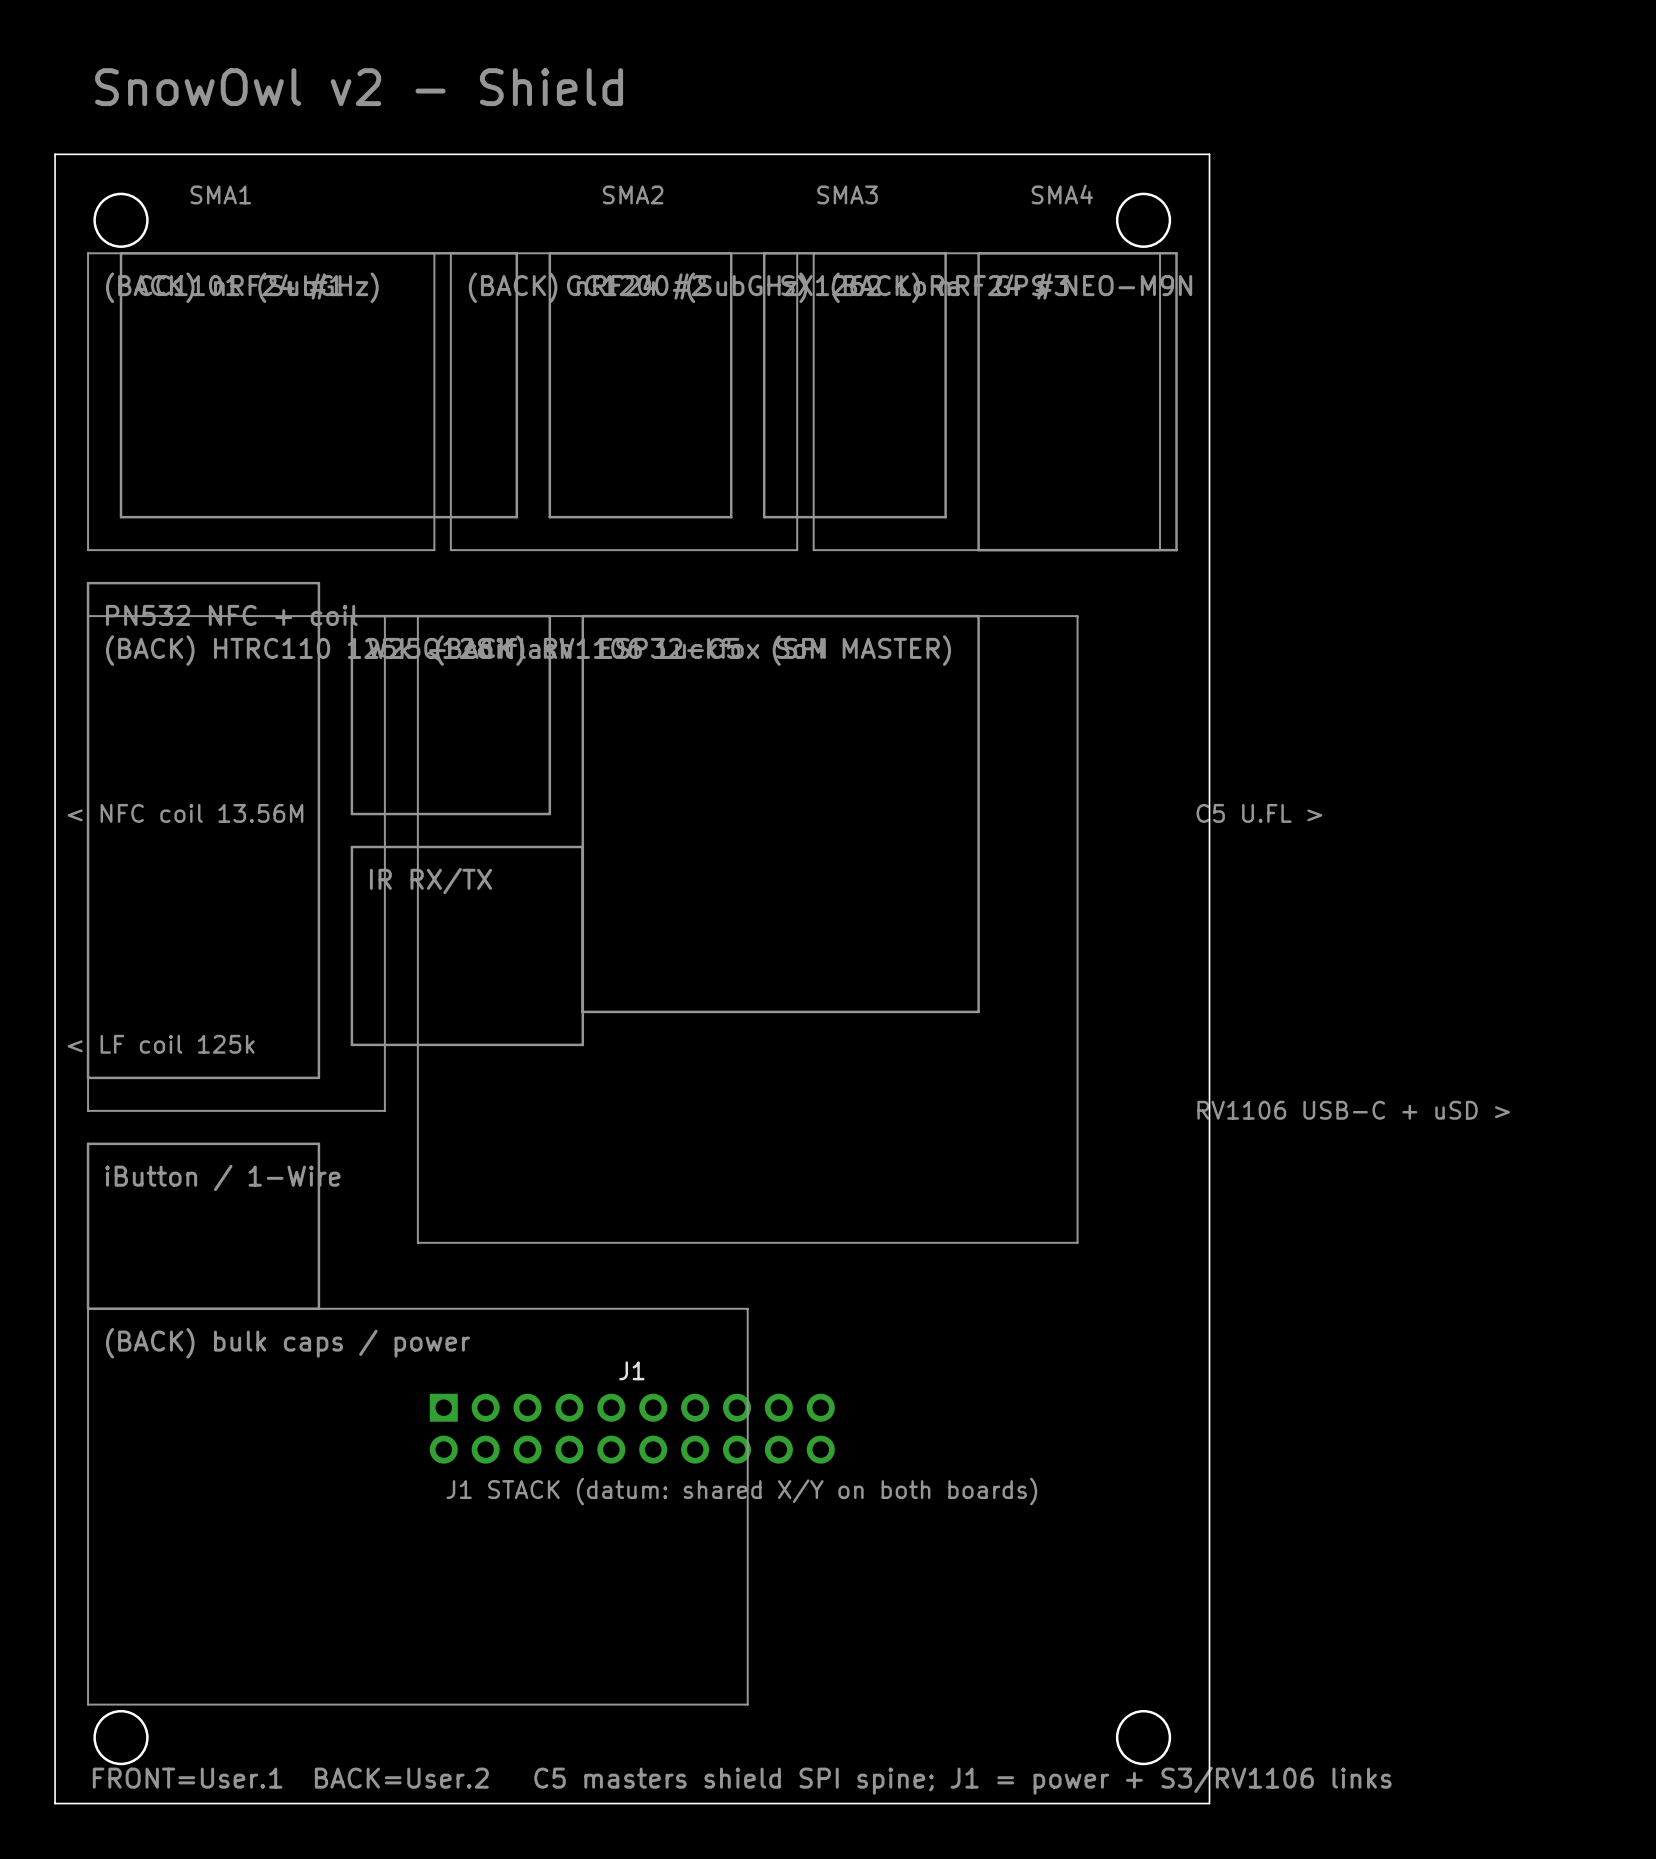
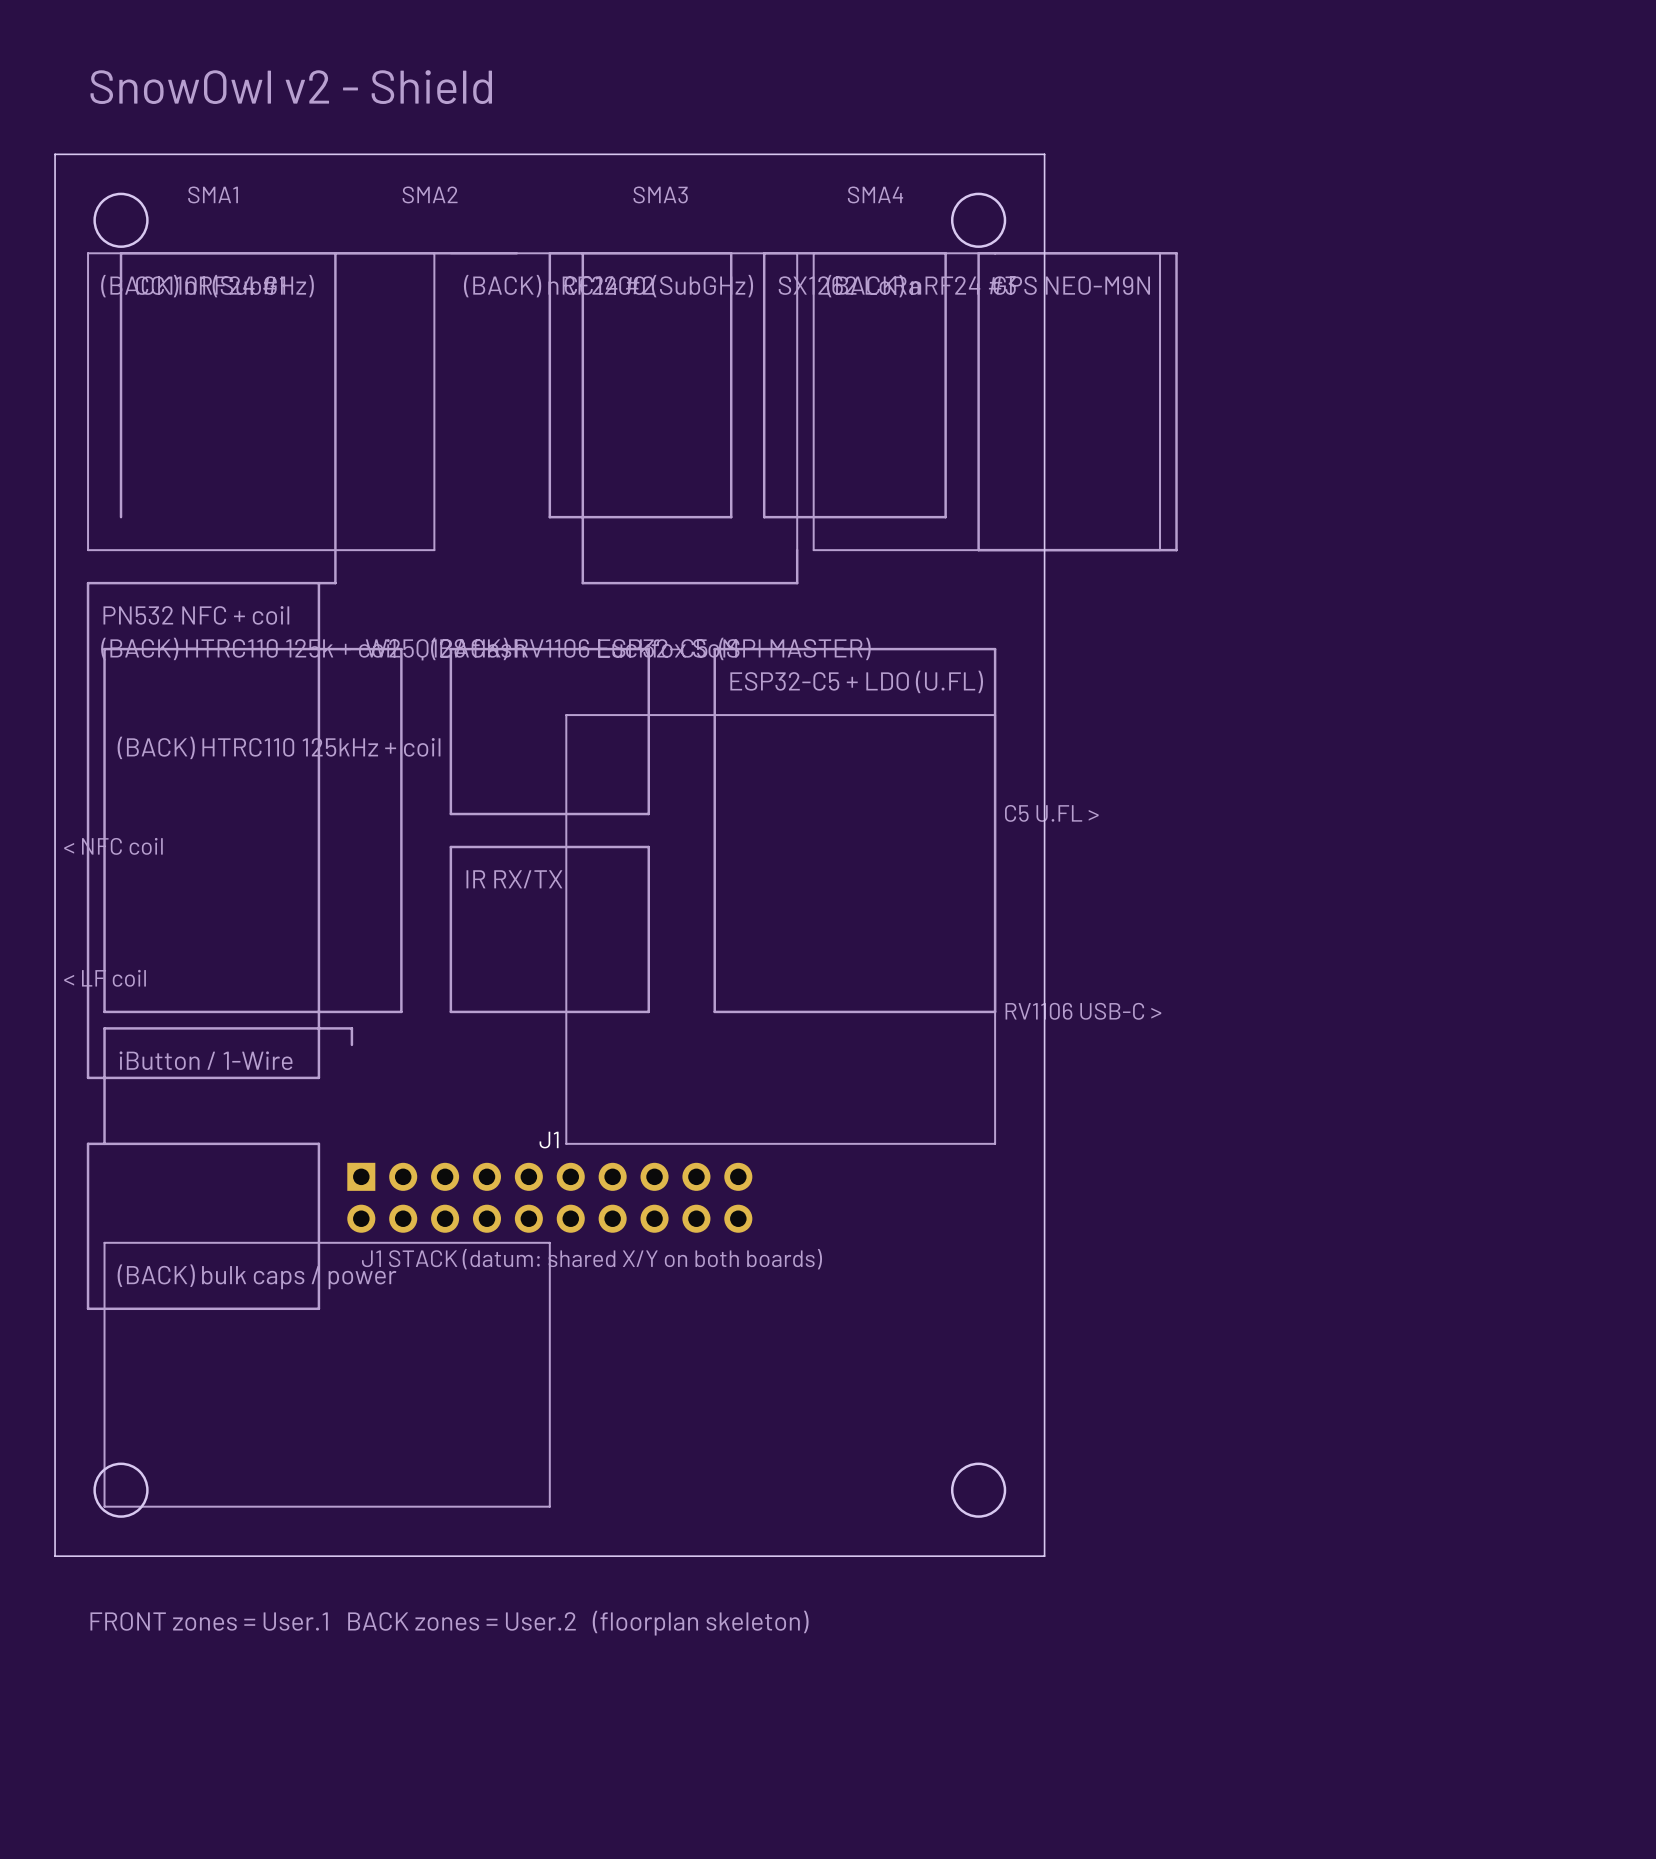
board edge: (1044, 154) (1209, 154) (1209, 1803) (55, 1803) (55, 1556) -> (1044, 154) (1044, 1556) (55, 1556)
text position: SMA2 (633, 194) -> SMA2 (430, 194)
text position: SMA3 (847, 194) -> SMA3 (660, 194)
text position: SMA4 (1062, 194) -> SMA4 (875, 194)
round board edge position: (1143, 220) -> (978, 220)
line: none -> (335, 253) (335, 583) (318, 583)
line: (450, 253) (450, 550) (797, 550) -> (582, 253) (582, 583) (797, 583) (797, 550)
line: (516, 253) (516, 517) (121, 517) -> none
line: (88, 616) (88, 1110) (384, 1110) (384, 616) (88, 616) -> (104, 649) (104, 1011) (401, 1011) (401, 649) (104, 649)
text: none -> ESP32-C5 + LDO (U.FL) (856, 681)
line: none -> (566, 715) (995, 715) (995, 1143) (566, 1143) (566, 715)
text: none -> (BACK) HTRC110 125kHz + coil (279, 747)
text: < NFC coil 13.56M (185, 813) -> < NFC coil (113, 846)
text position: C5 U.FL > (1259, 813) -> C5 U.FL > (1051, 813)
line: (450, 814) (351, 814) (351, 616) (549, 616) (549, 814) -> (450, 814) (450, 649) (648, 649) (648, 814) (549, 814)
line: (450, 847) (351, 847) (351, 1028) -> (450, 847) (450, 1011) (582, 1011)
text position: IR RX/TX (430, 881) -> IR RX/TX (514, 879)
text: none -> < LF coil (105, 978)
line: (648, 1011) (714, 1011) -> (648, 1011) (648, 847) (582, 847)
line: (978, 1011) (978, 616) (582, 616) (582, 1044) (351, 1044) -> (978, 1011) (995, 1011) (995, 649) (714, 649) (714, 1011)
text: none -> RV1106 USB-C > (1083, 1011)
line: none -> (351, 1028) (104, 1028) (104, 1143)
text: < LF coil 125k (161, 1044) -> none
text: RV1106 USB-C + uSD > (1353, 1110) -> none
text position: iButton / 1-Wire (222, 1177) -> iButton / 1-Wire (206, 1060)
line: (417, 1242) (417, 616) (1077, 616) (1077, 1242) (549, 1242) -> (417, 1242) (104, 1242) (104, 1506) (549, 1506) (549, 1242)
line: (88, 1308) (88, 1704) (747, 1704) (747, 1308) (88, 1308) -> none
text position: (BACK) bulk caps / power (288, 1343) -> (BACK) bulk caps / power (256, 1276)
J1 position: (632, 1428) -> (549, 1197)
text position: J1 STACK (datum: shared X/Y on both boards) (741, 1491) -> J1 STACK (datum: shared X/Y on both boards) (592, 1259)
text: none -> FRONT zones = User.1 BACK zones = User.2 (floorplan skeleton) (449, 1623)
round board edge position: (121, 1737) -> (121, 1490)
round board edge position: (1143, 1737) -> (978, 1490)
text: FRONT=User.1 BACK=User.2 C5 masters shield SPI spine; J1 = power + S3/RV1106 links (742, 1780) -> none

